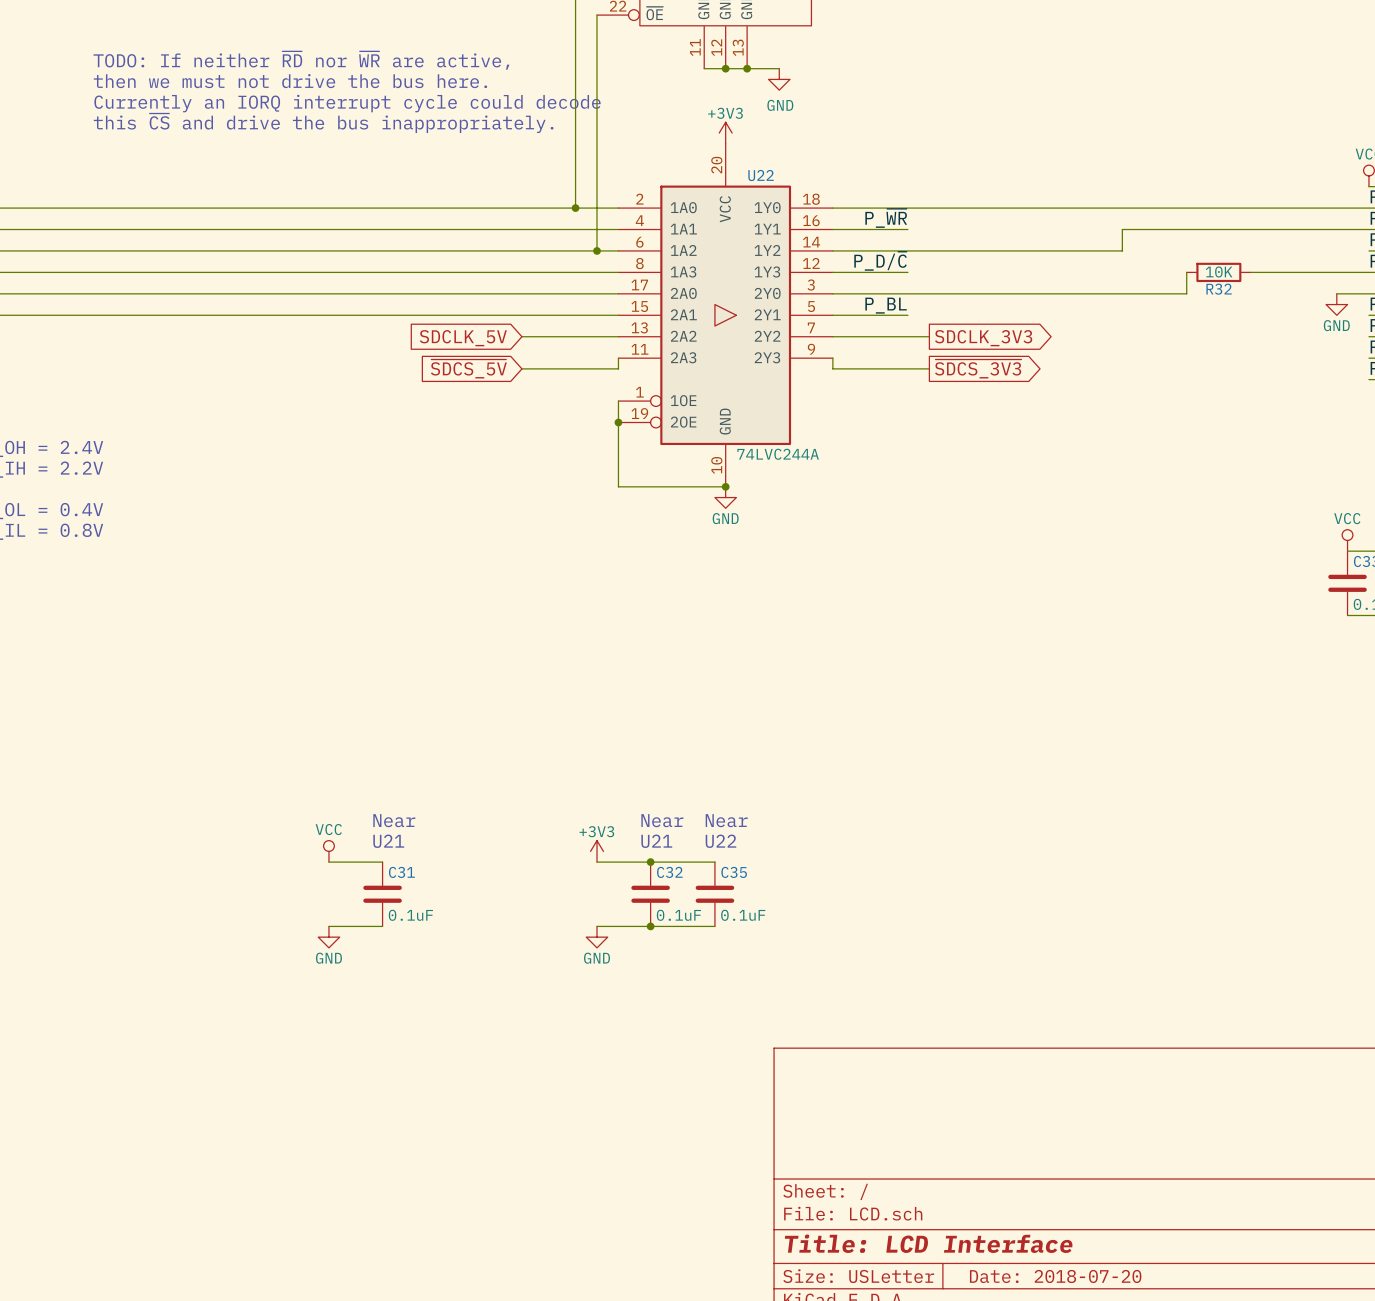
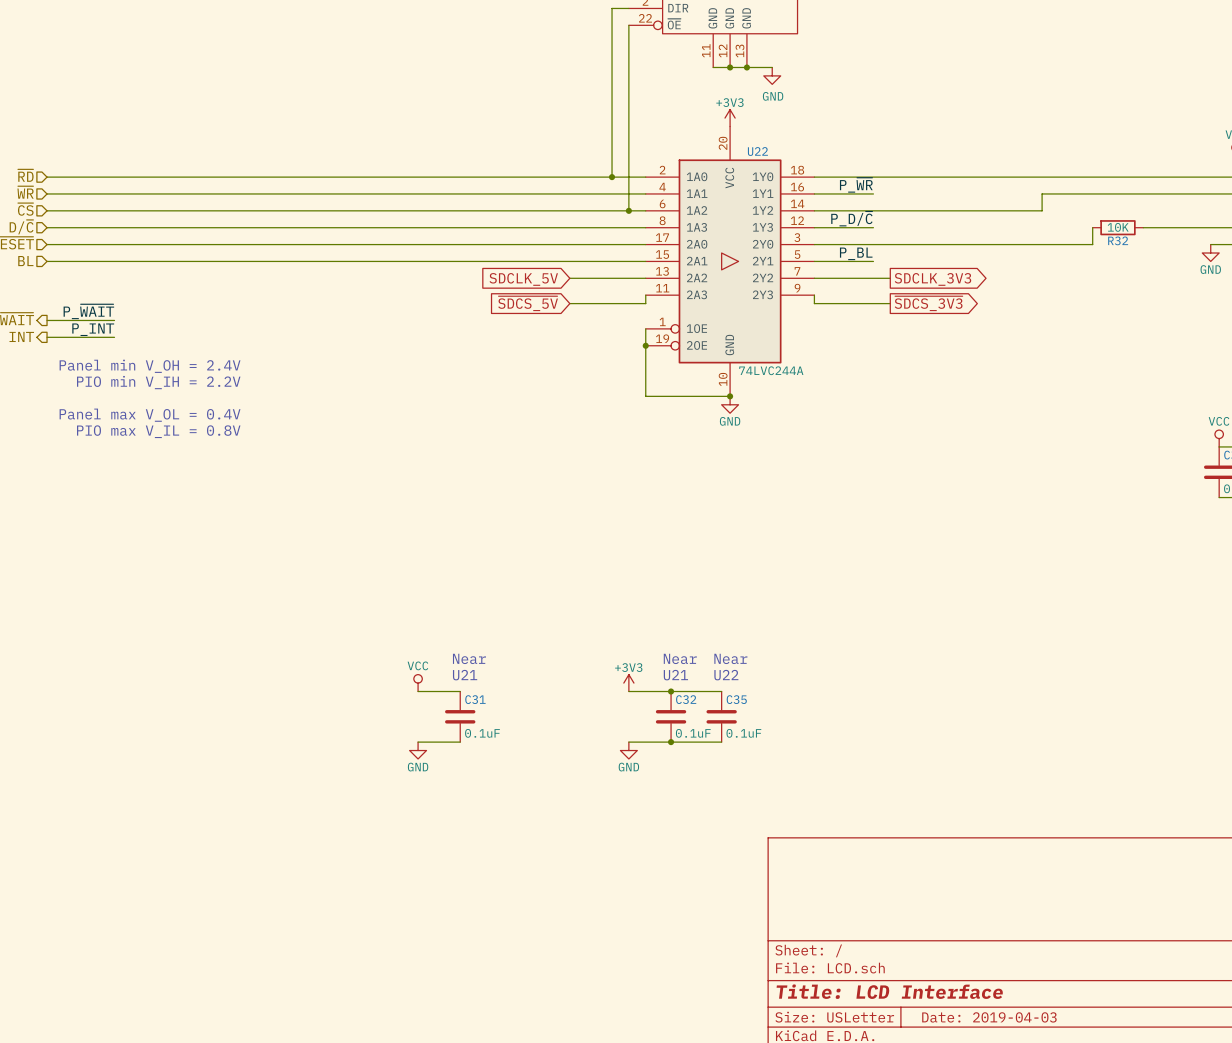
text: TODO: If neither ~{RD} nor ~{WR} are active, (301, 60) -> none
text: then we must not drive the bus here. (290, 81) -> none
text: Currently an IORQ interrupt cycle could decode (347, 103) -> none
text: this ~{CS} and drive the bus inappropriately. (323, 123) -> none
title block: Date: 2018-07-20 (1055, 1276) -> Date: 2019-04-03 (989, 1017)

